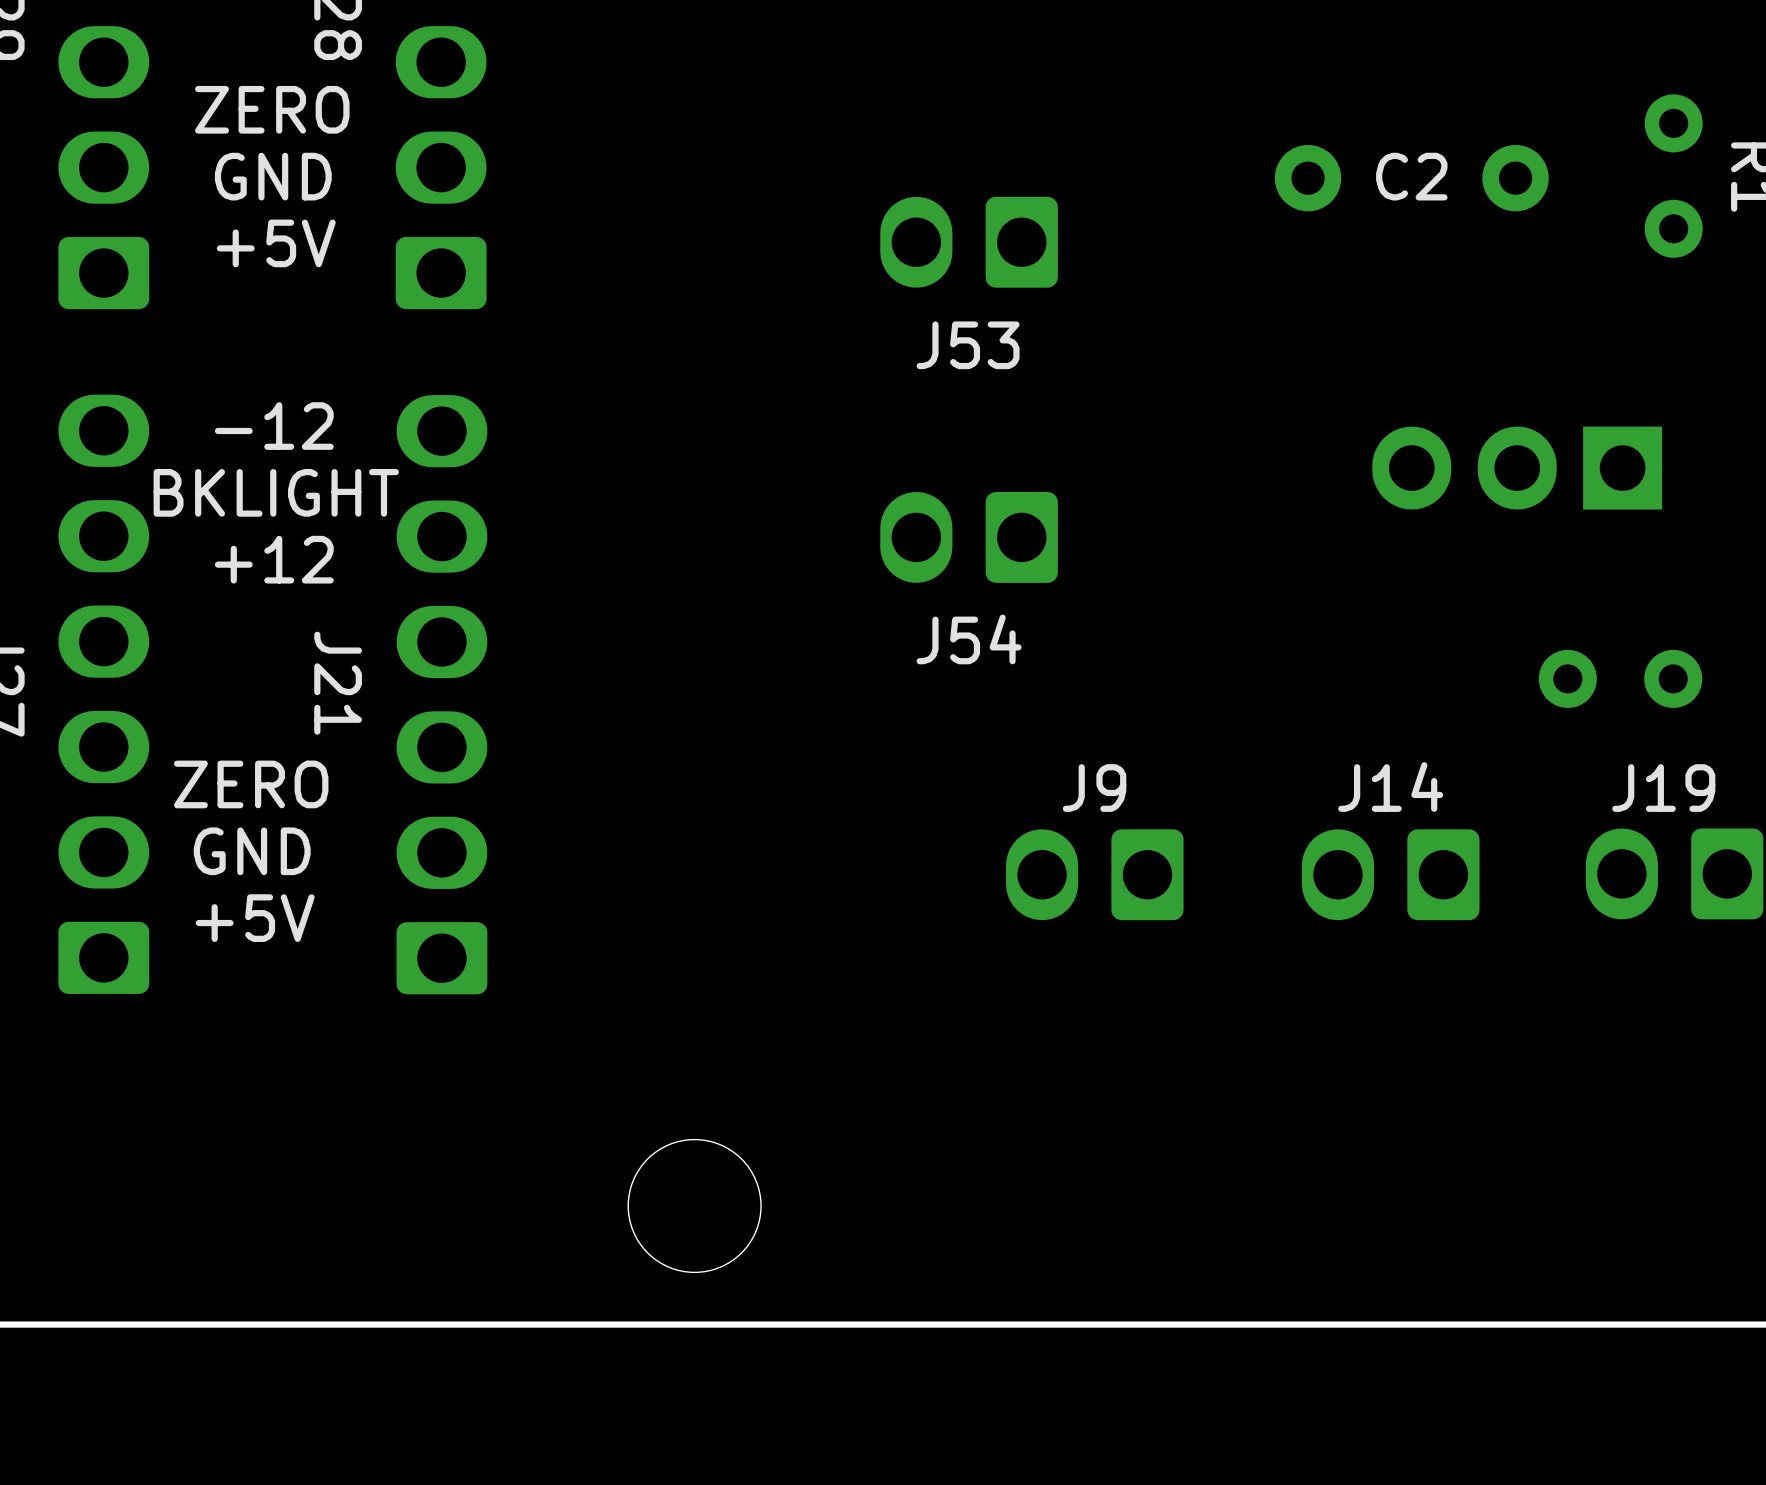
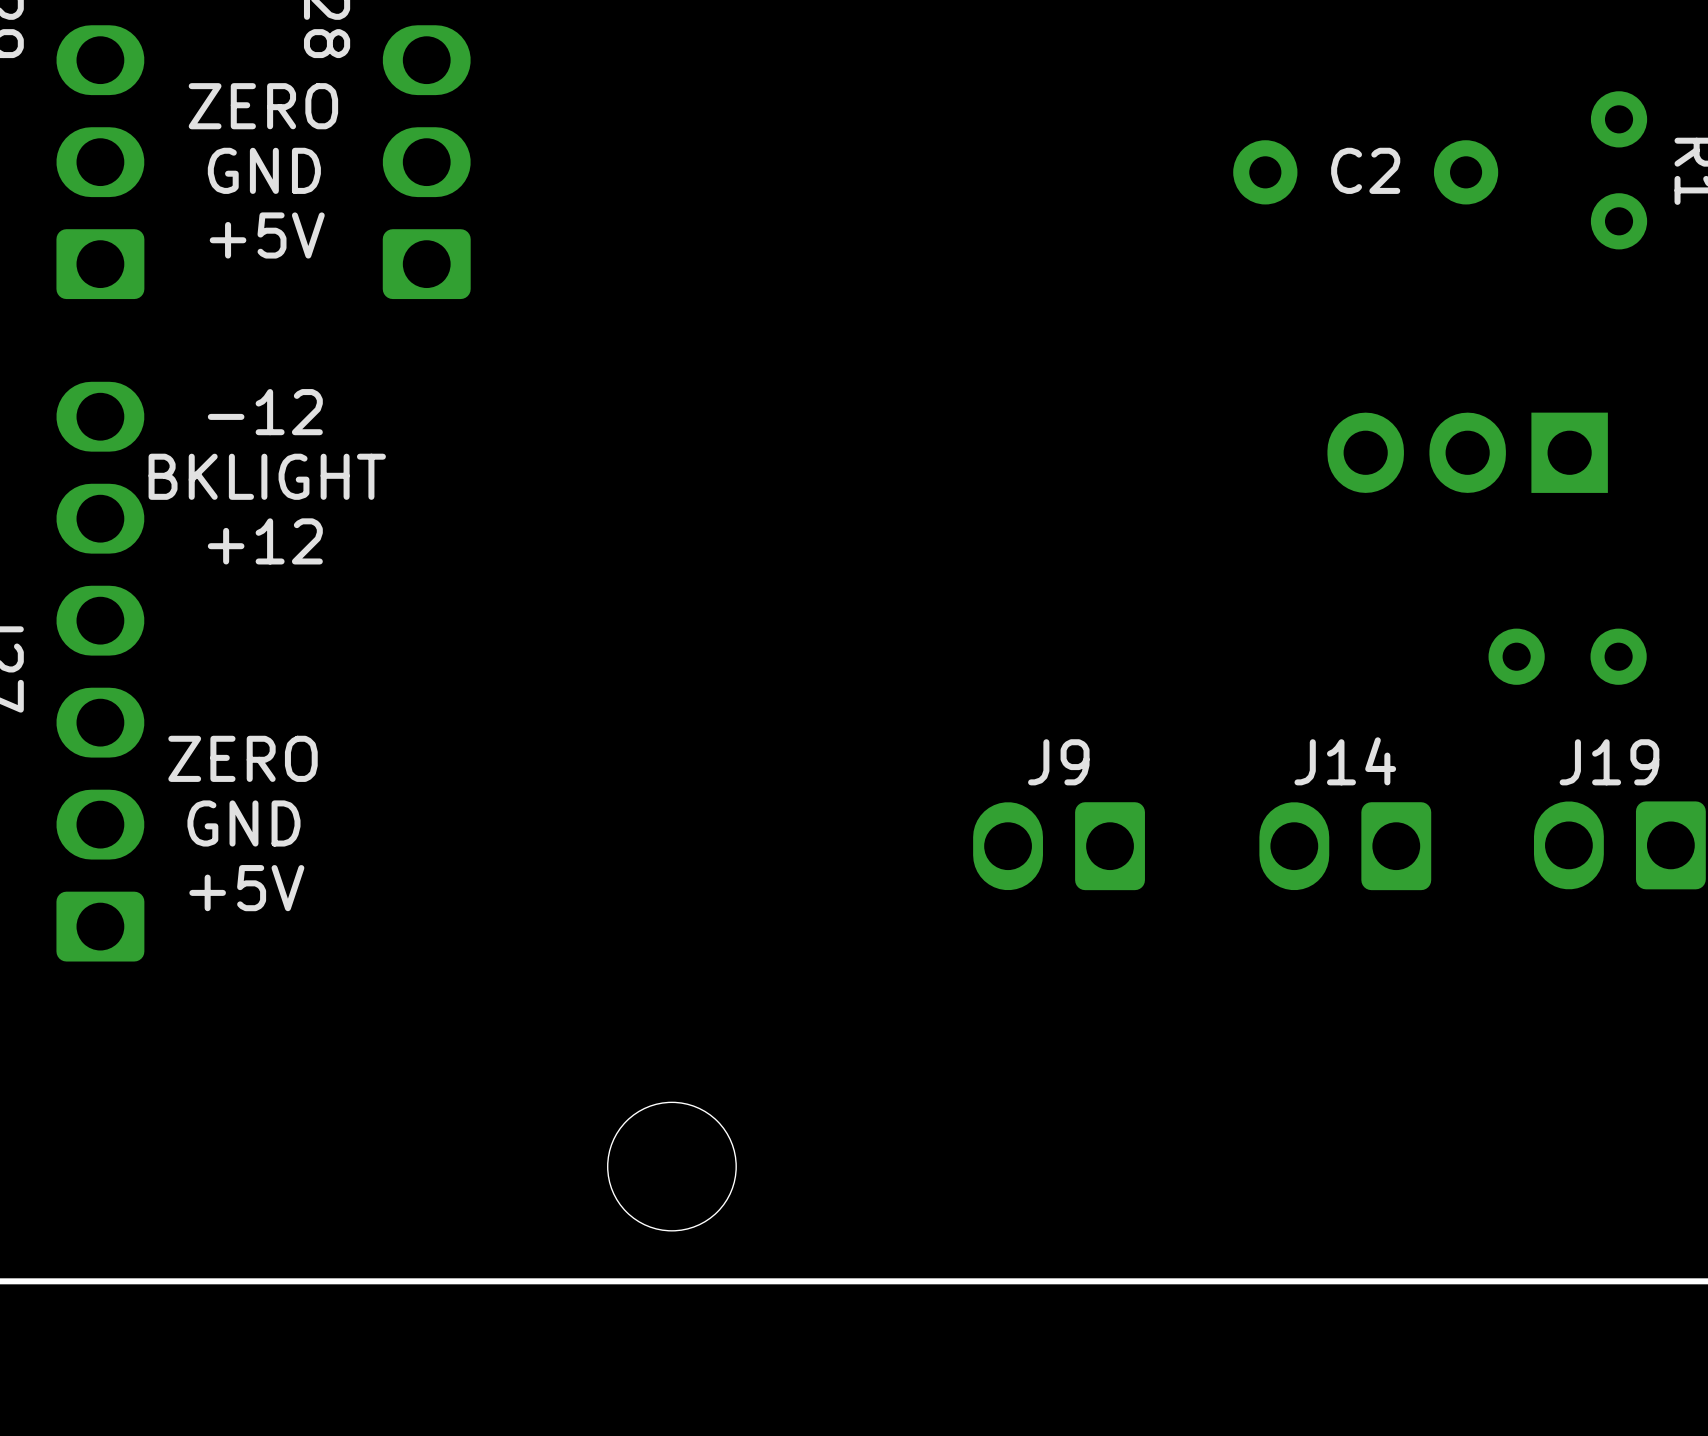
J53: (969, 242) -> none
J54: (969, 537) -> none
J21: (441, 694) -> none

